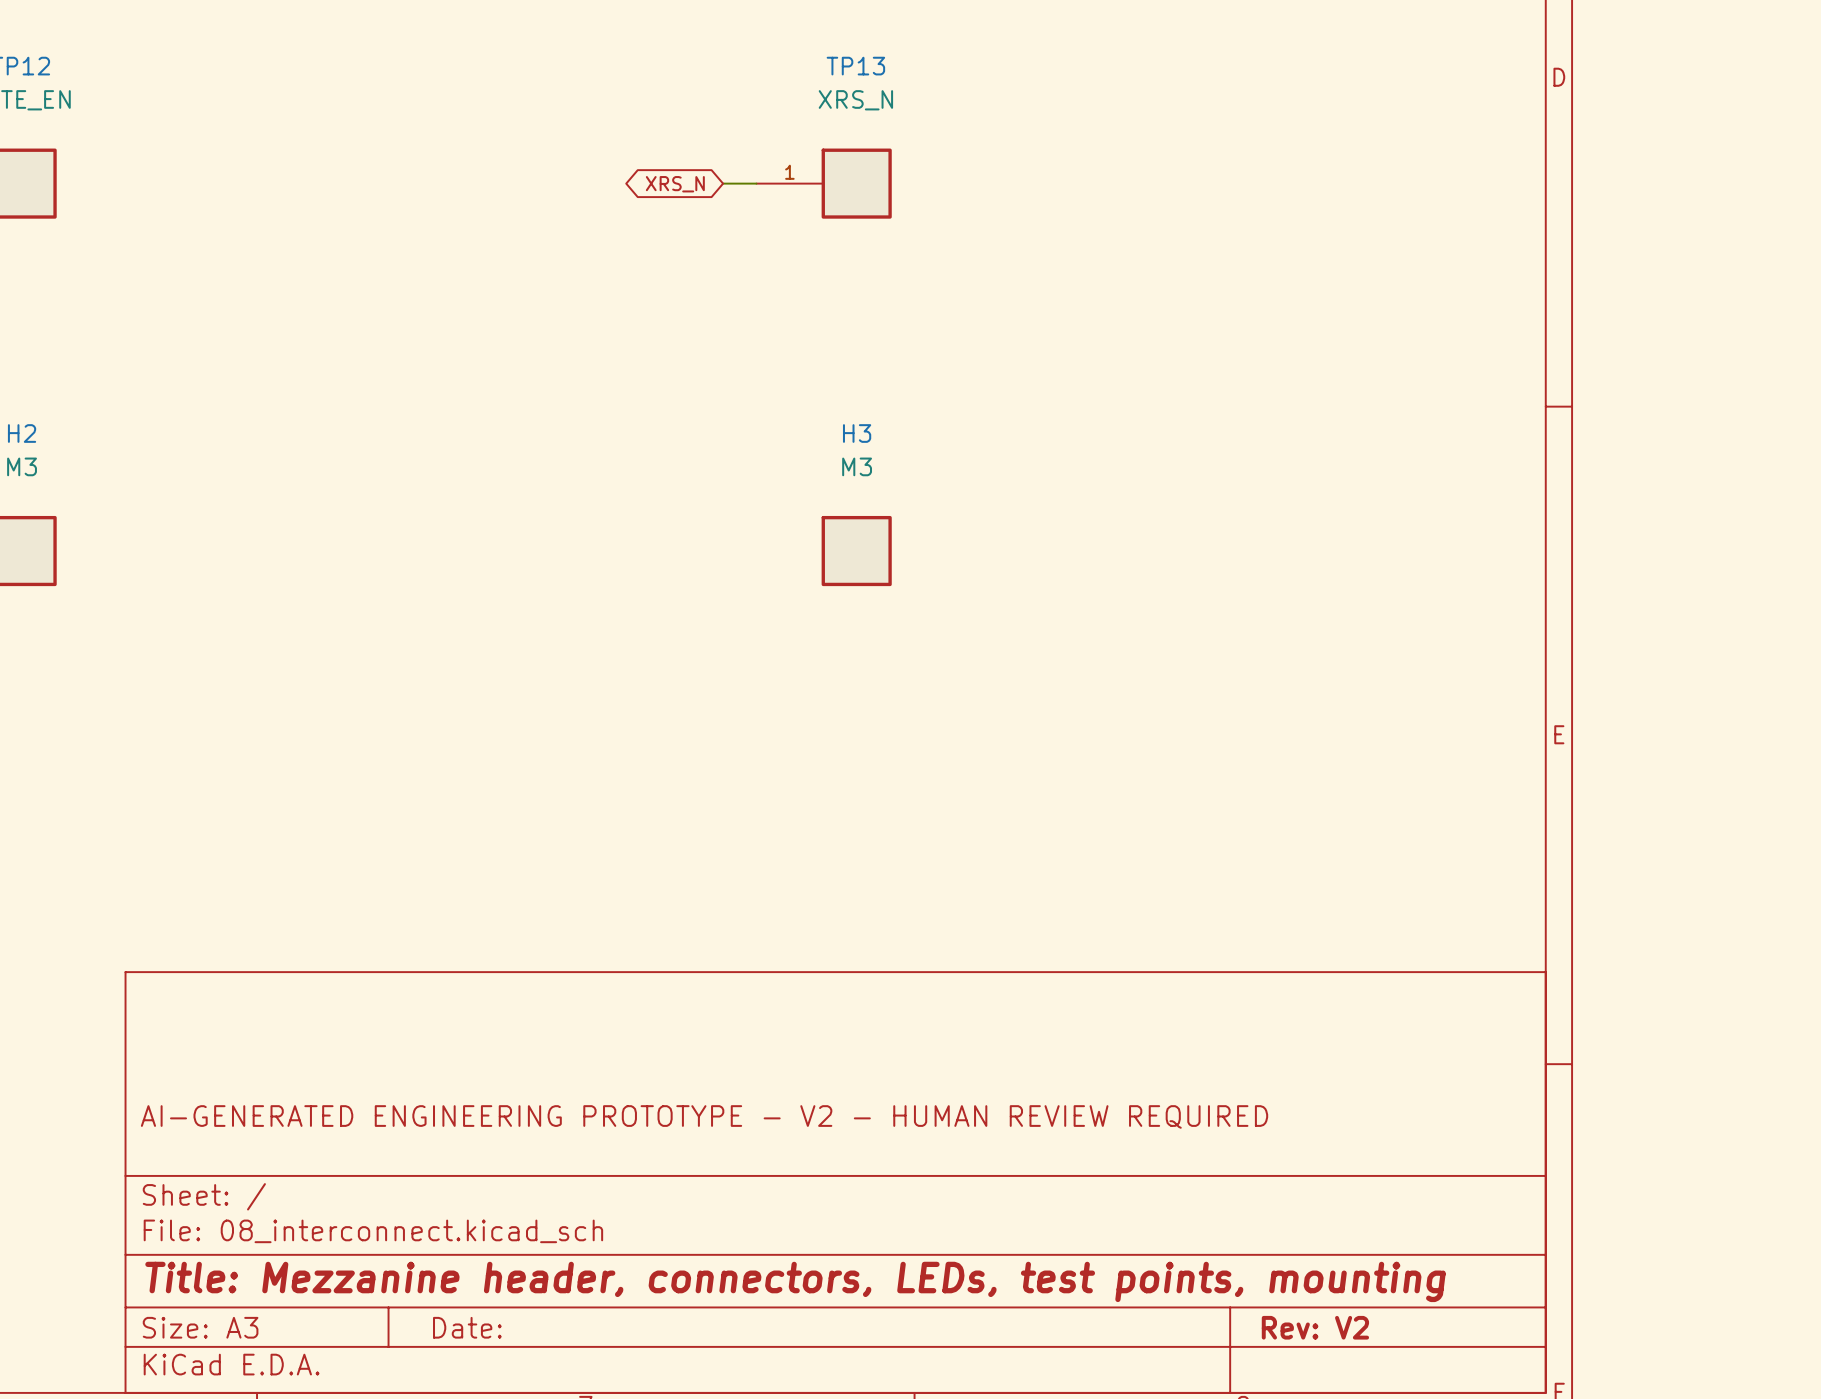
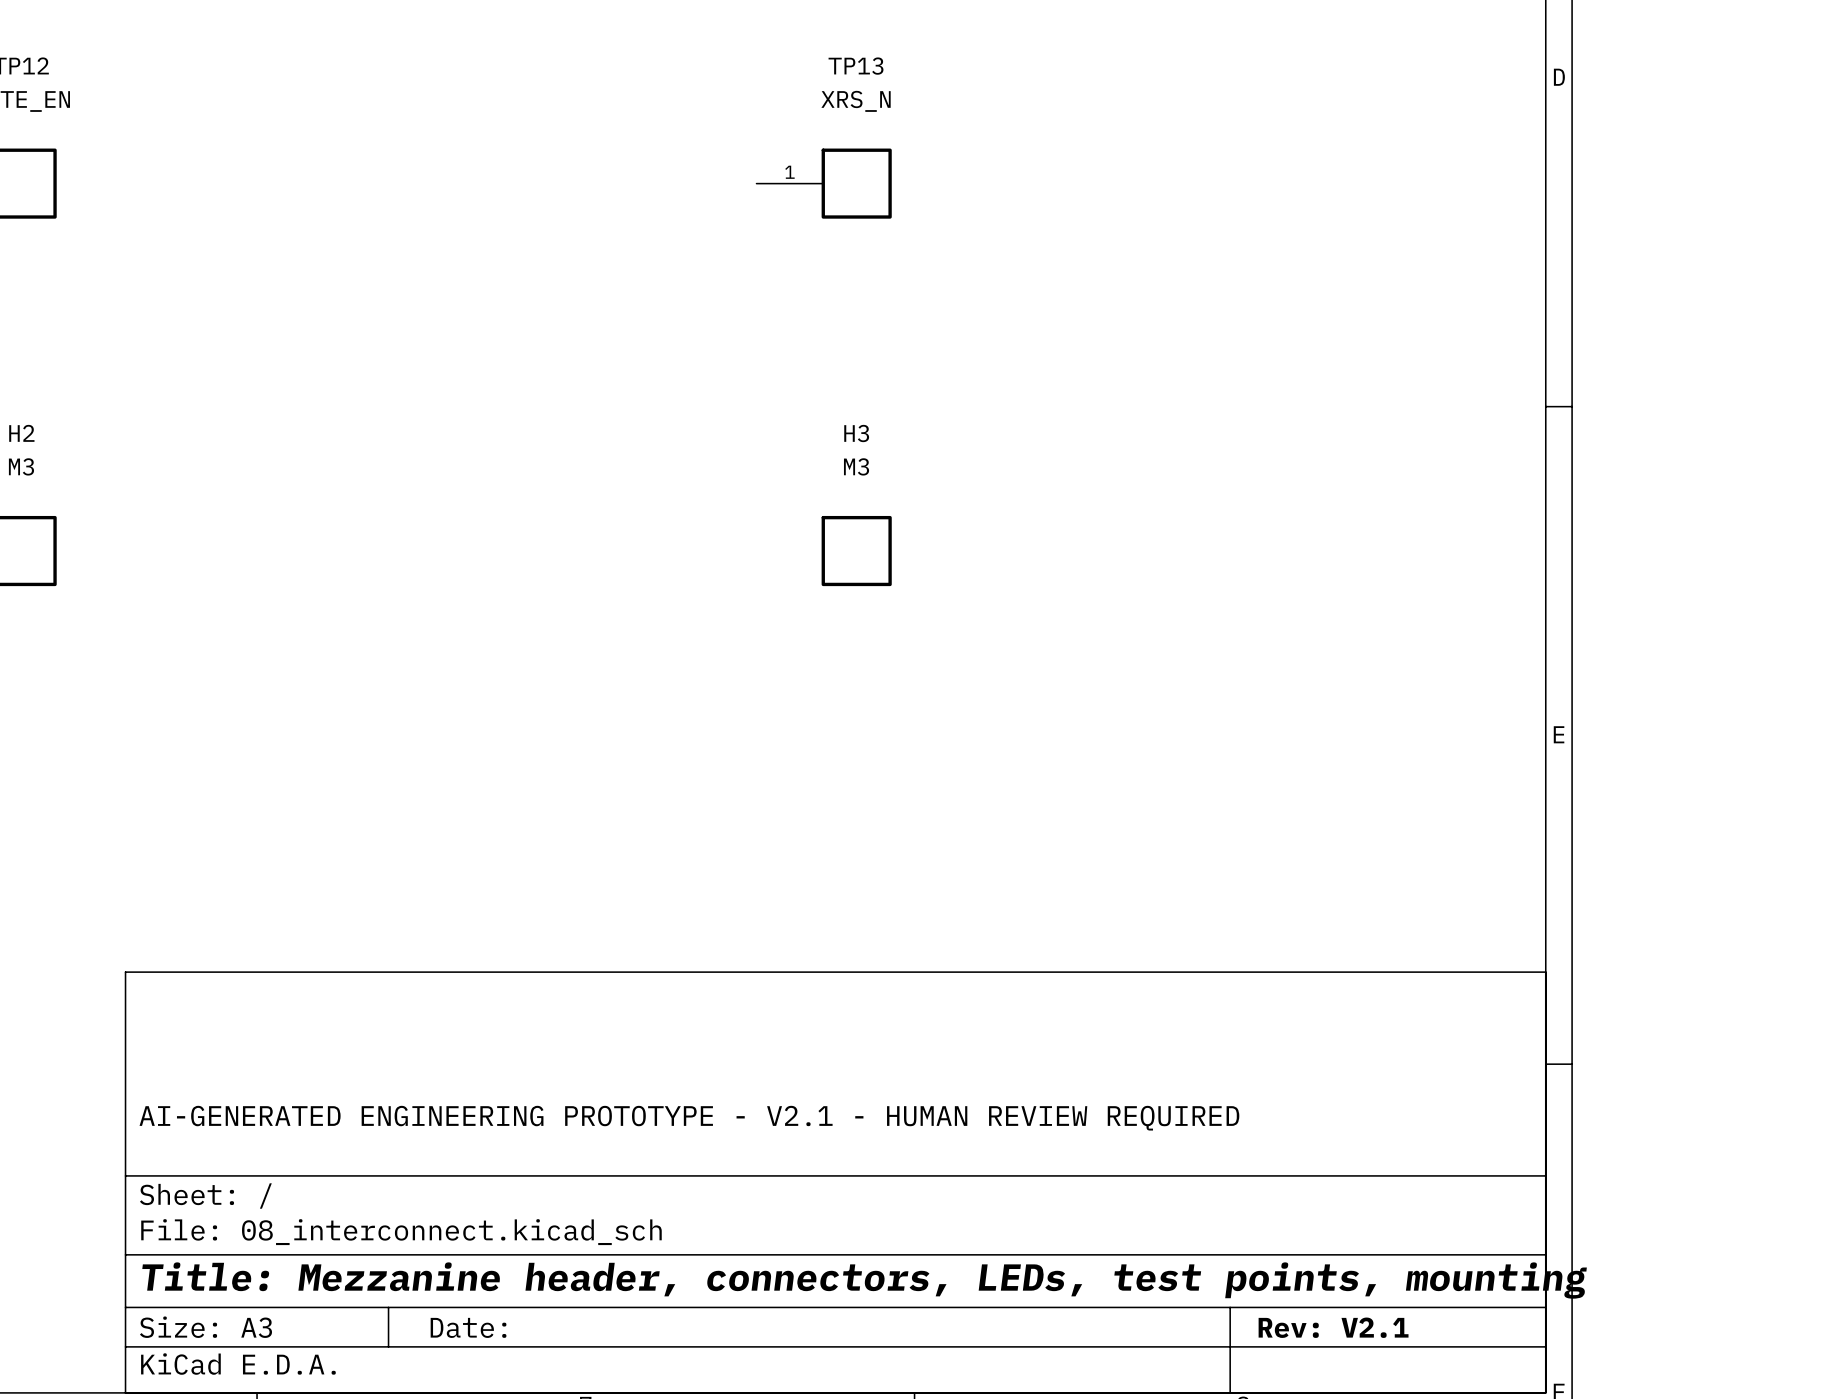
wire: (723, 183) (756, 183) -> none
global label: XRS_N (675, 184) -> none
title block: AI-GENERATED ENGINEERING PROTOTYPE - V2 - HUMAN REVIEW REQUIRED (704, 1116) -> AI-GENERATED ENGINEERING PROTOTYPE - V2.1 - HUMAN REVIEW REQUIRED (689, 1118)
title block: Rev: V2 (1315, 1327) -> Rev: V2.1 (1333, 1327)

